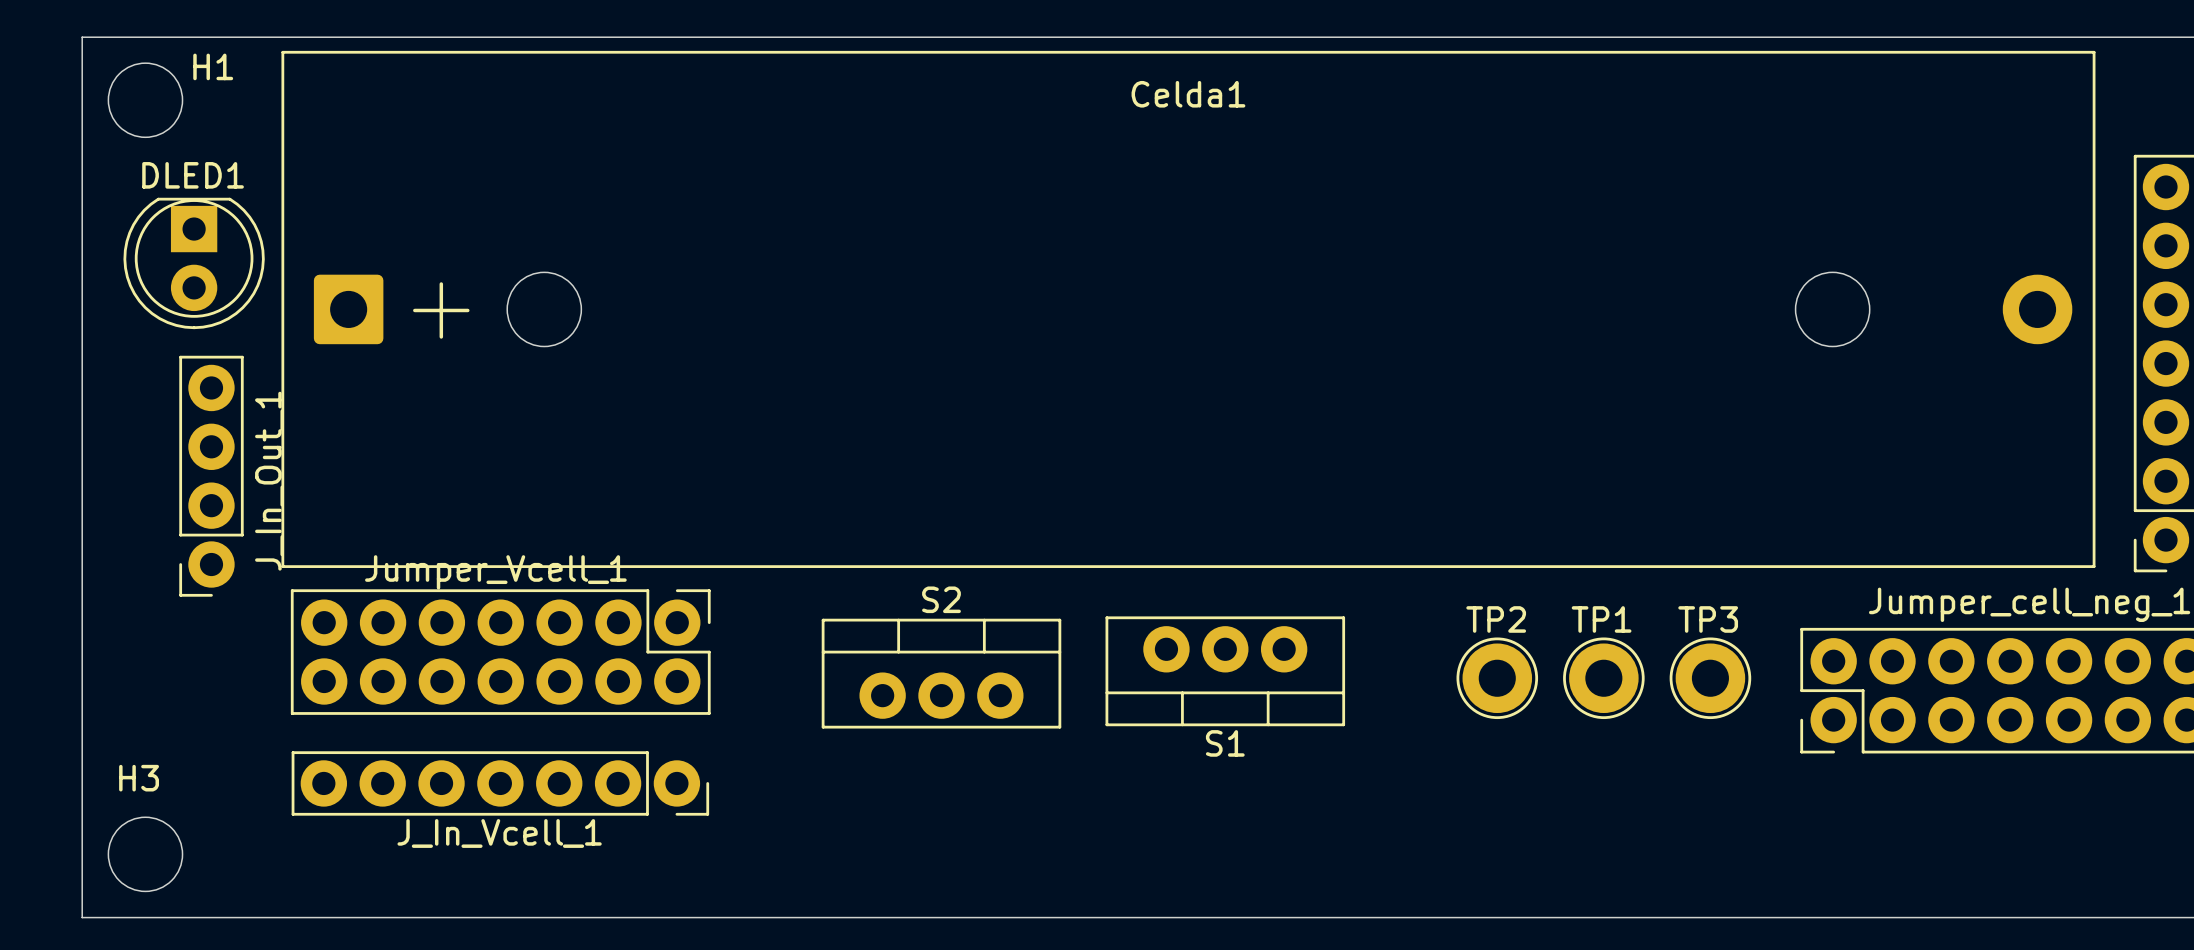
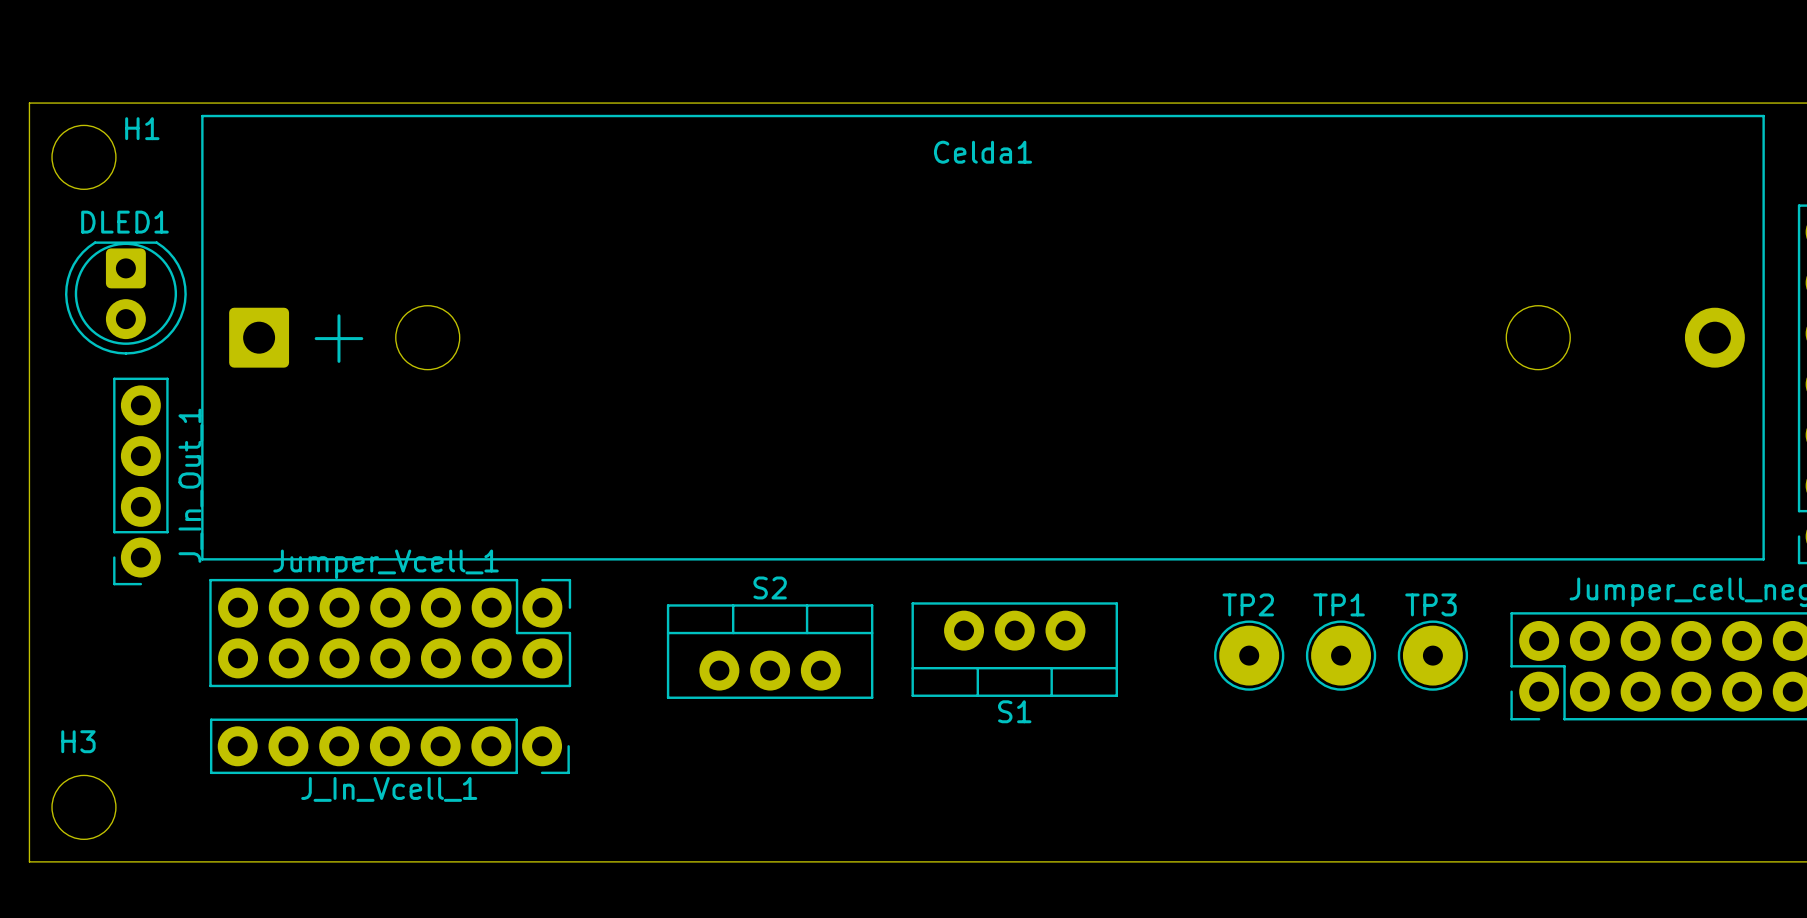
DLED1 footprint: [123, 197, 265, 330] -> [64, 241, 187, 355]
TP2 footprint: [1456, 637, 1539, 720] -> [1214, 620, 1285, 691]
TP1 footprint: [1563, 637, 1645, 720] -> [1305, 620, 1377, 691]
TP3 footprint: [1669, 637, 1752, 720] -> [1397, 620, 1469, 691]

